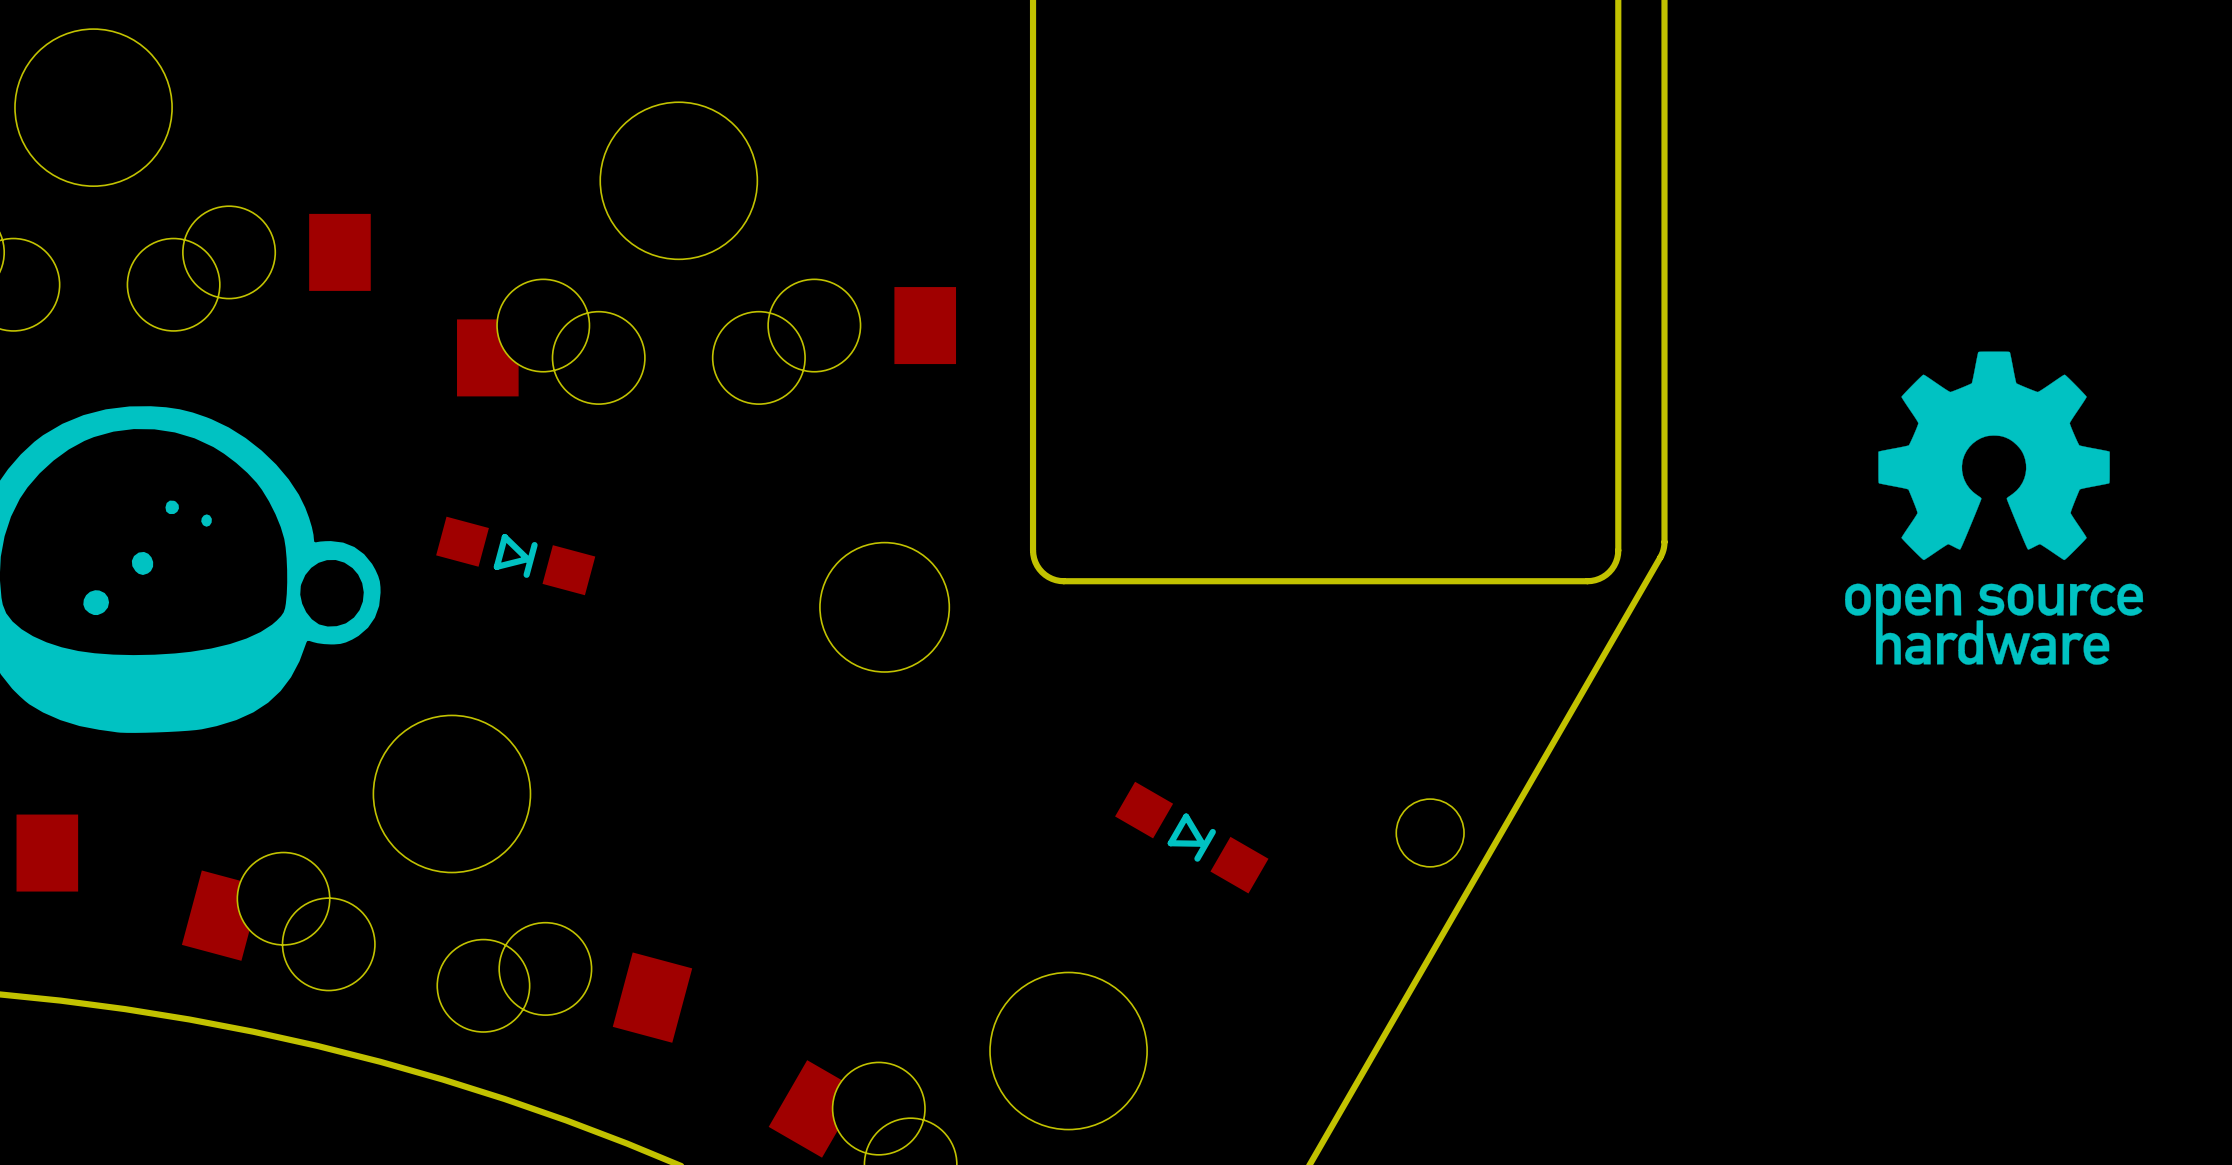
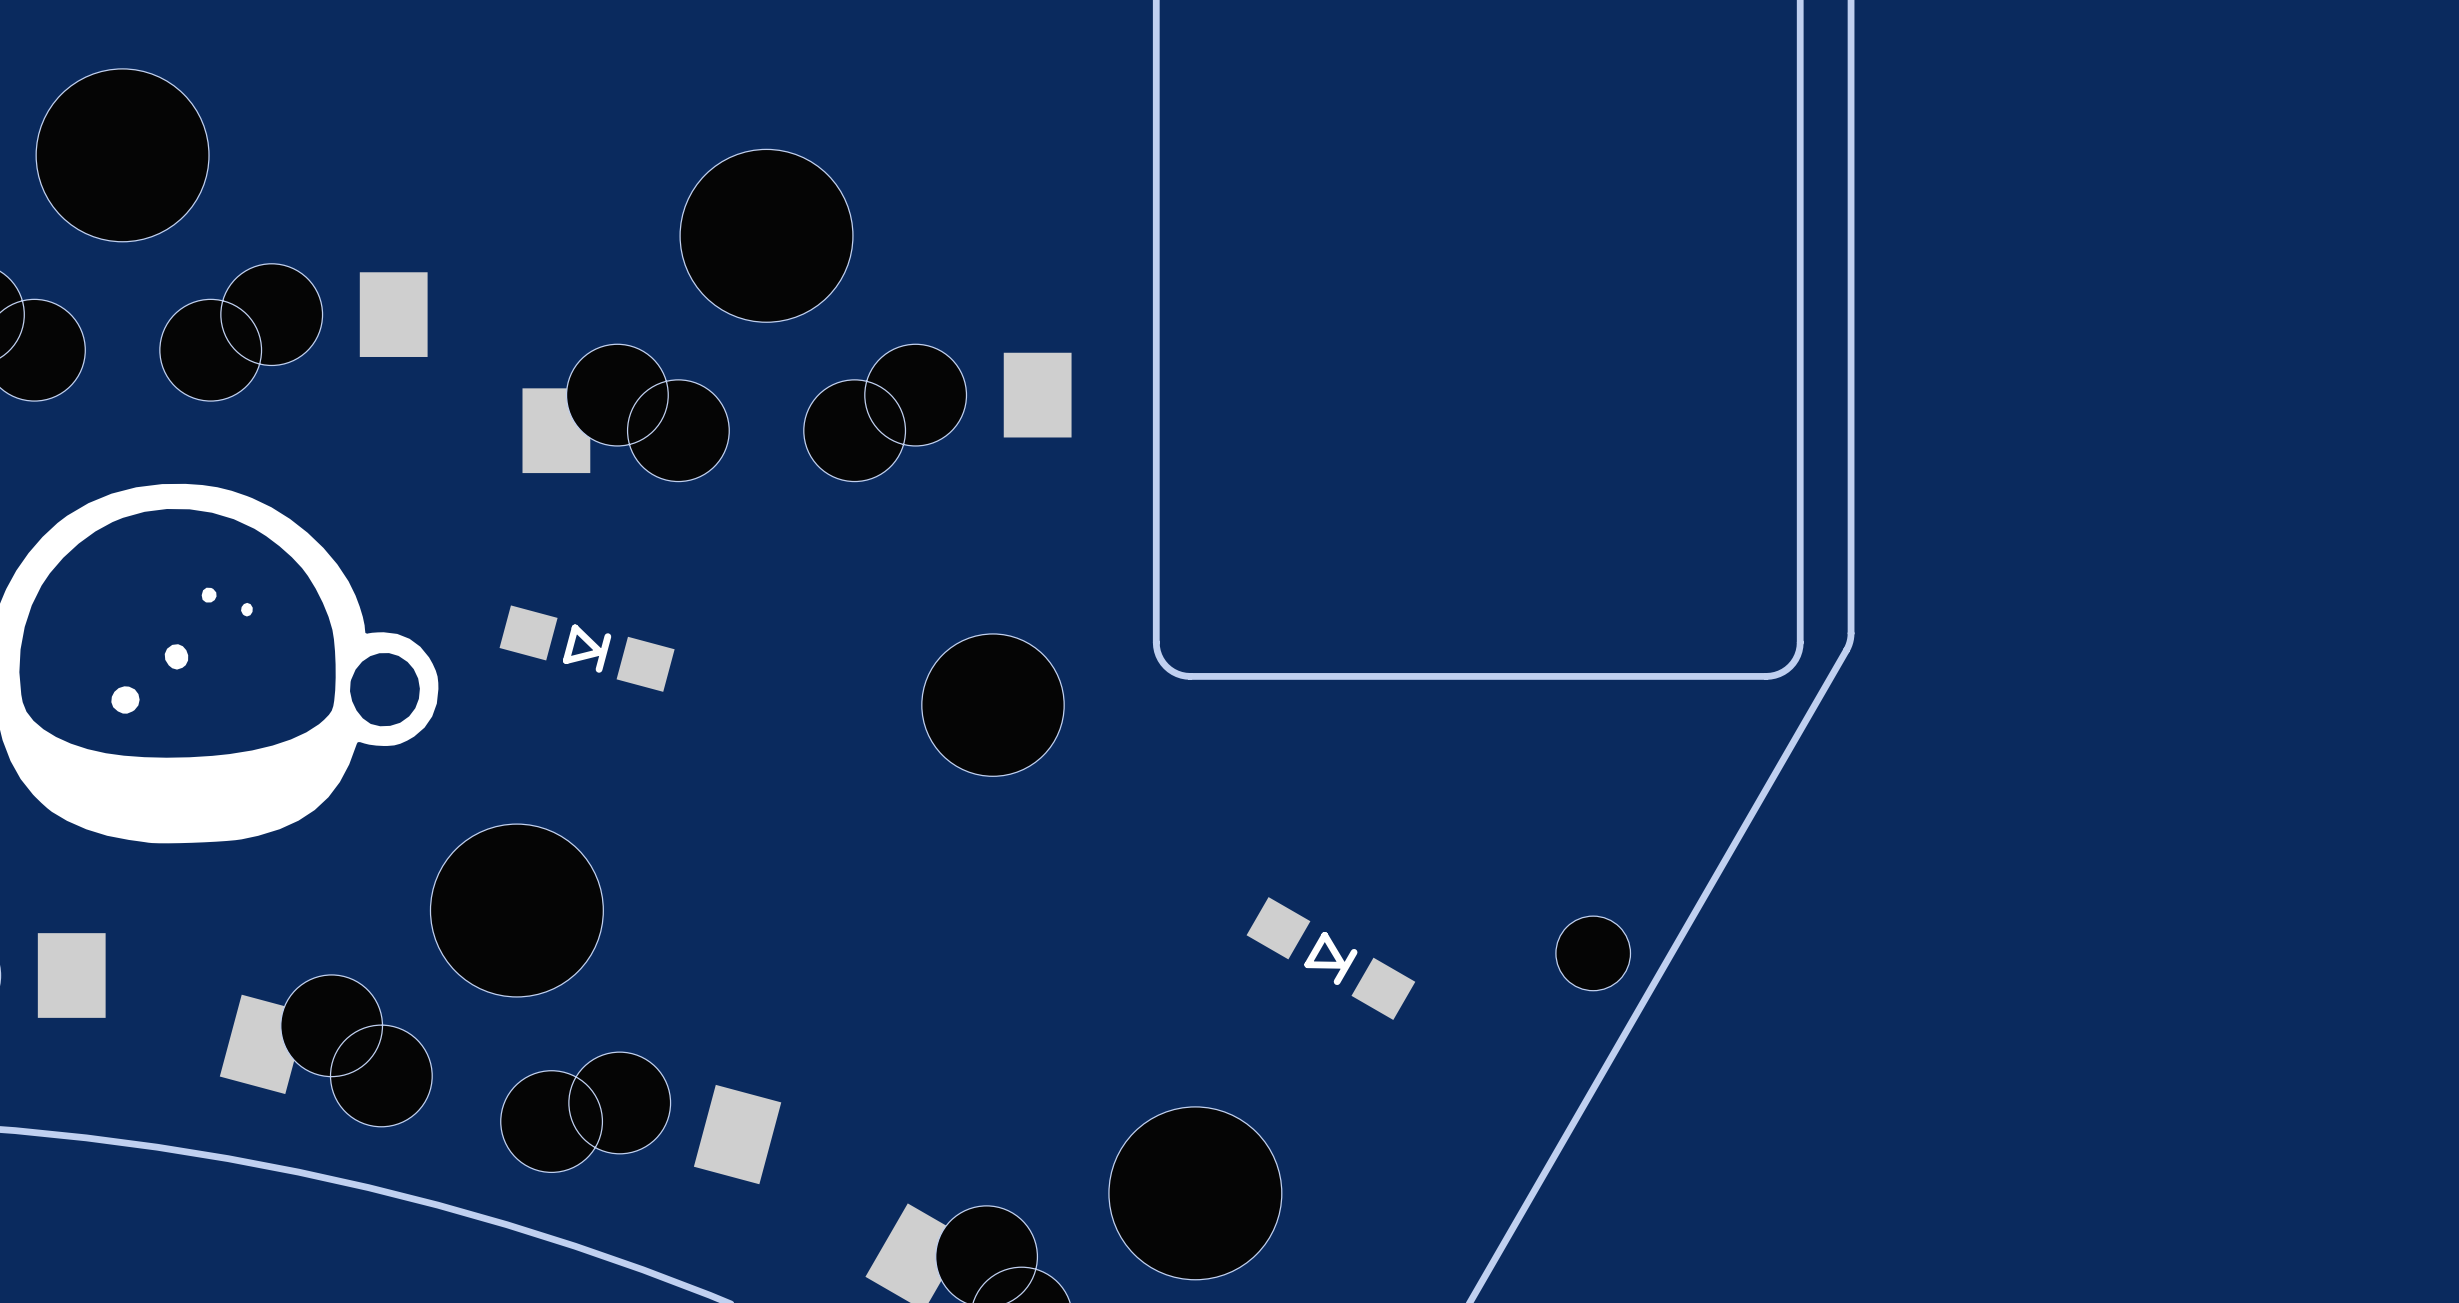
drawing: [1845, 351, 2144, 665] -> none

